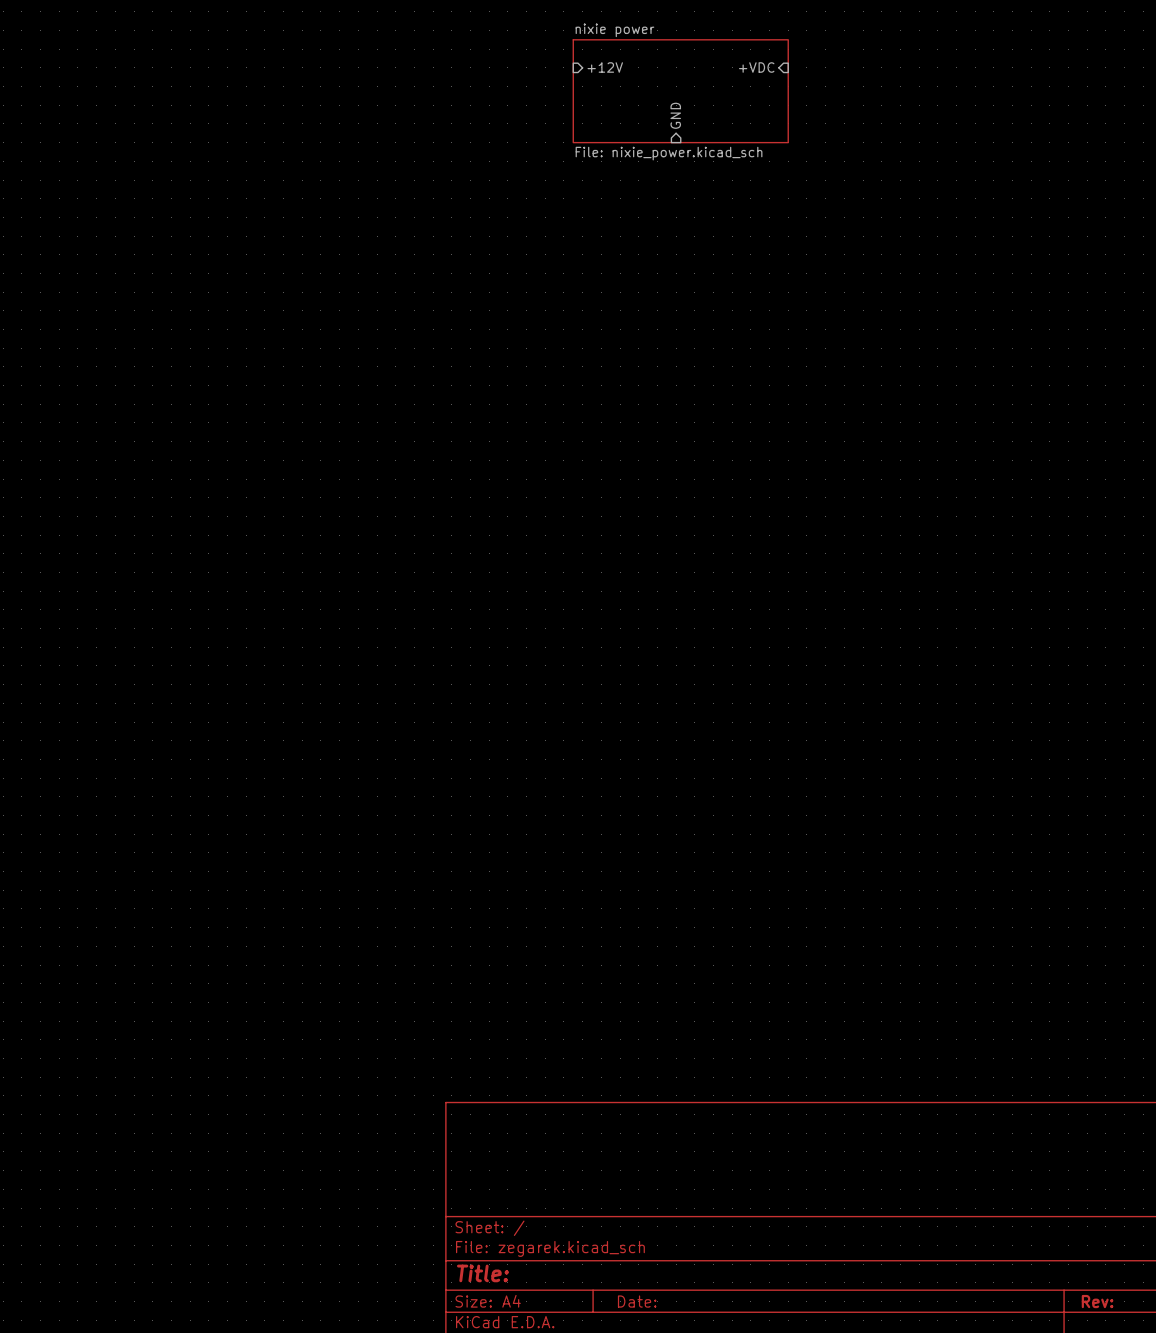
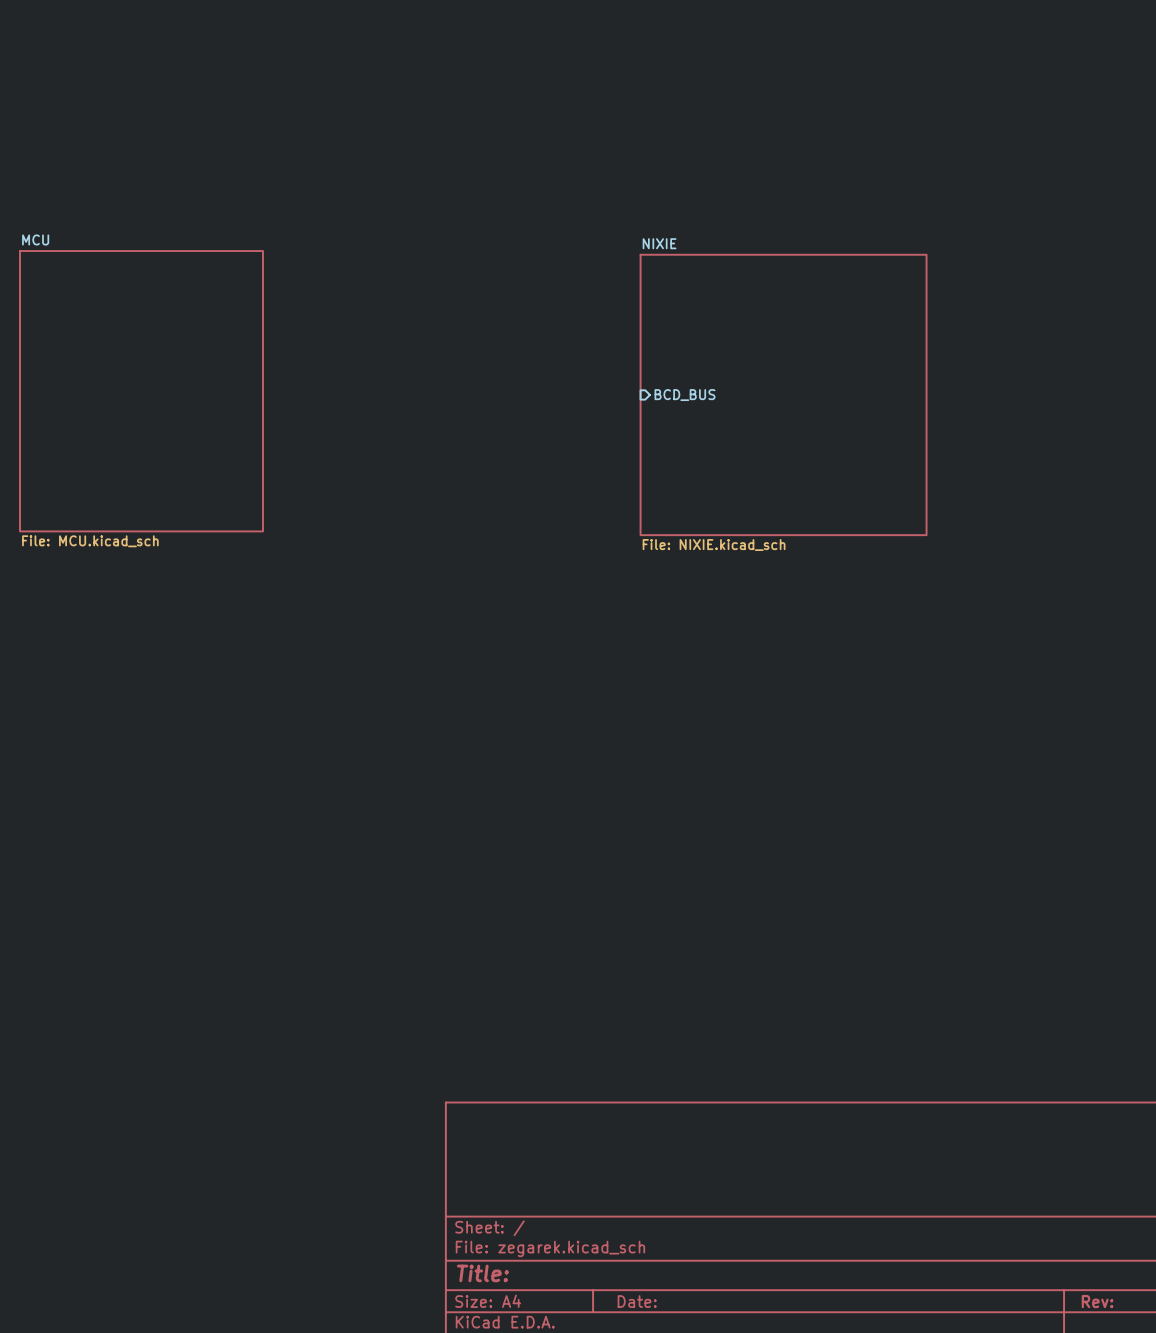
sheet pin: +12V (605, 67) -> none
sheet pin: +VDC (756, 67) -> none
sheet nixie power: File: nixie_power.kicad_sch (680, 91) -> none
sheet pin: GND (675, 115) -> none
sheet MCU: none -> File: MCU.kicad_sch (141, 391)
sheet NIXIE: none -> File: NIXIE.kicad_sch (783, 394)
sheet pin: none -> BCD_BUS (684, 395)

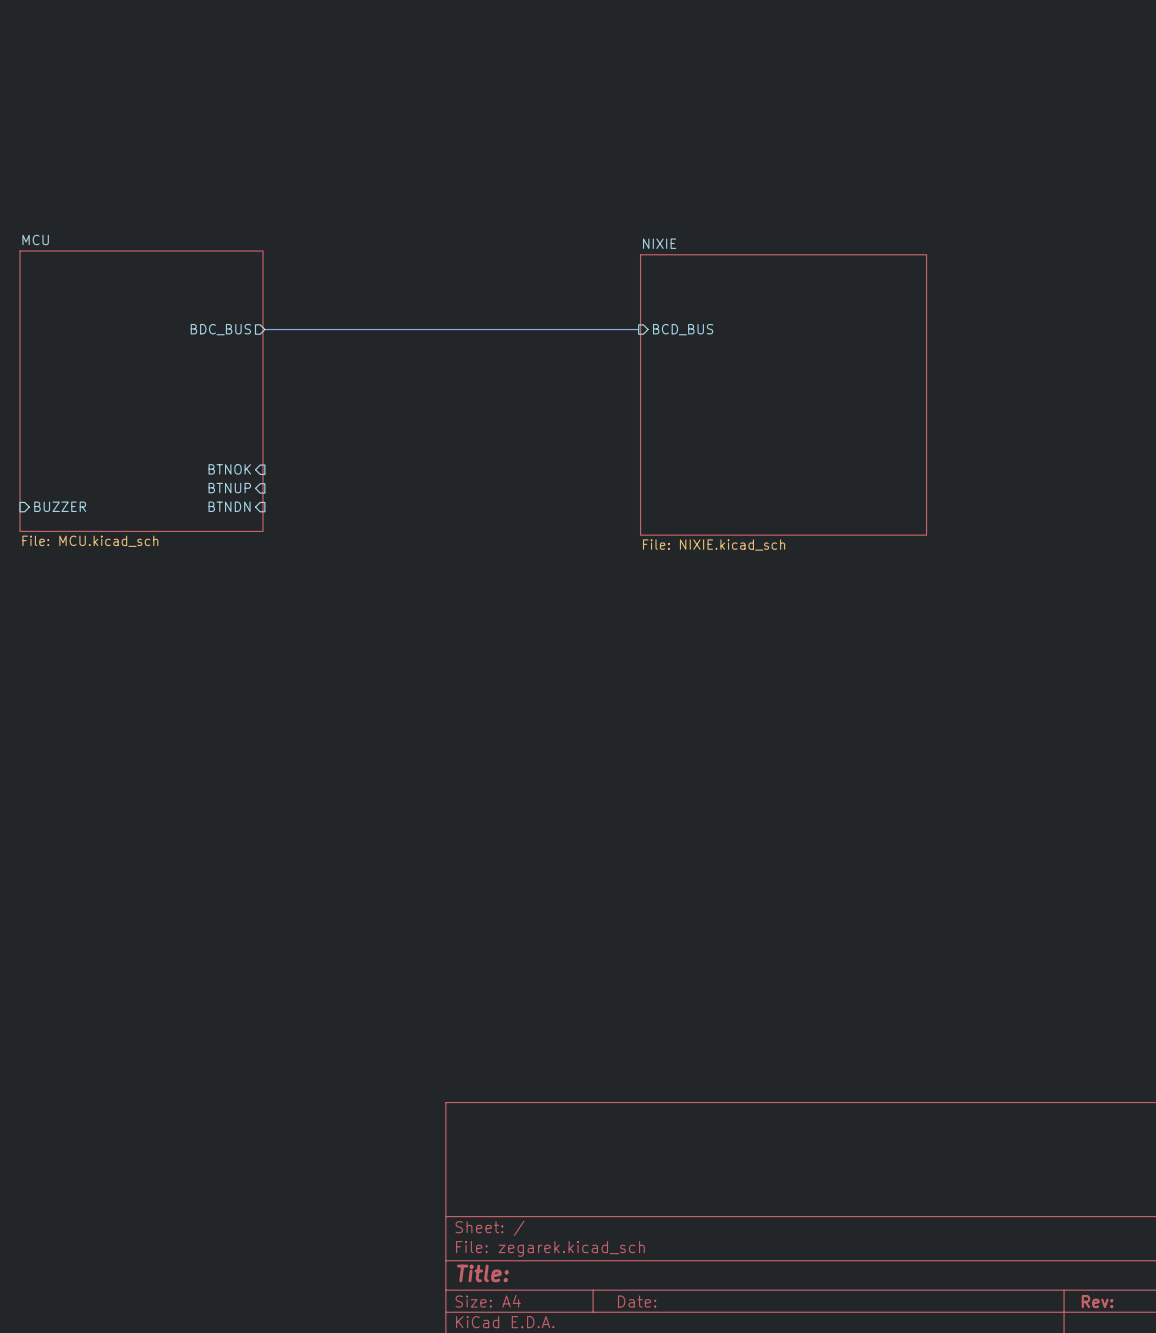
sheet pin: none -> BDC_BUS (220, 329)
bus: none -> (264, 329) (638, 329)
sheet pin position: BCD_BUS (684, 395) -> BCD_BUS (683, 329)
sheet pin: none -> BTNOK (229, 469)
sheet pin: none -> BTNUP (229, 488)
sheet pin: none -> BUZZER (60, 506)
sheet pin: none -> BTNDN (229, 506)

